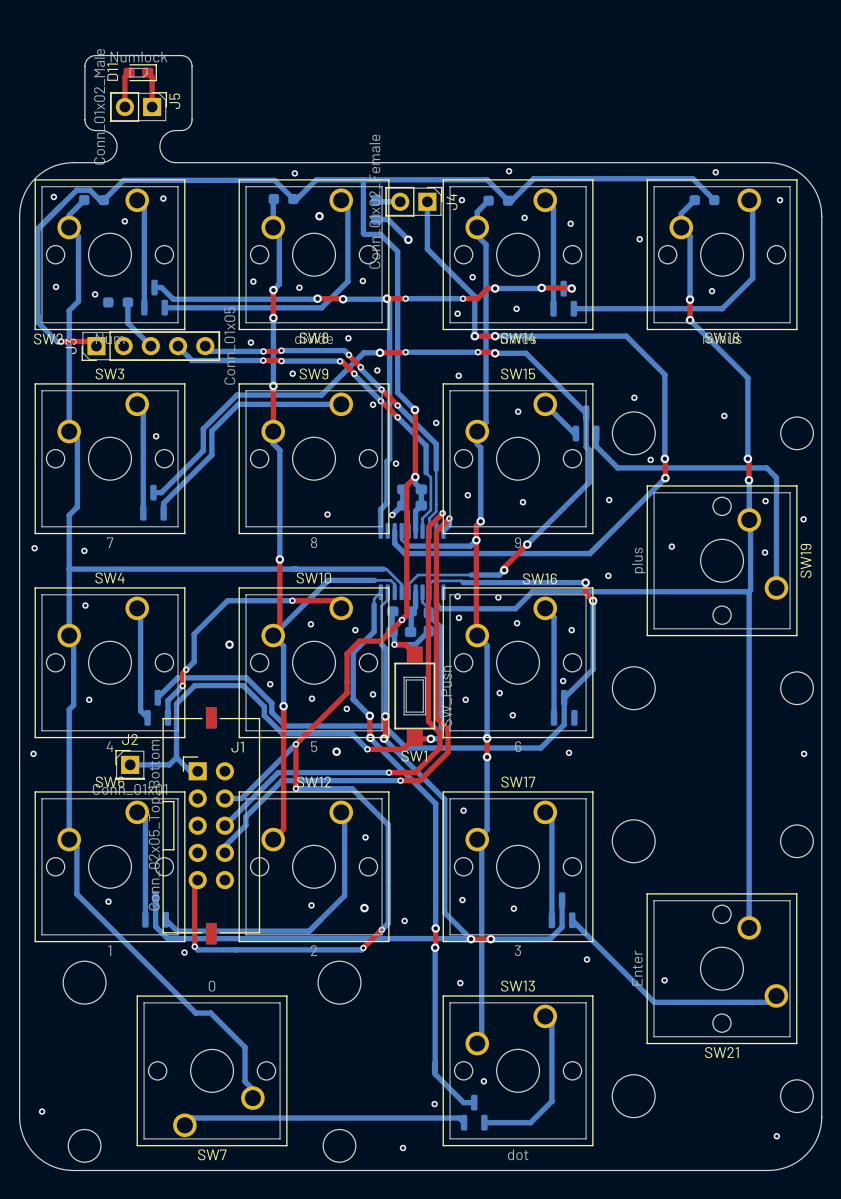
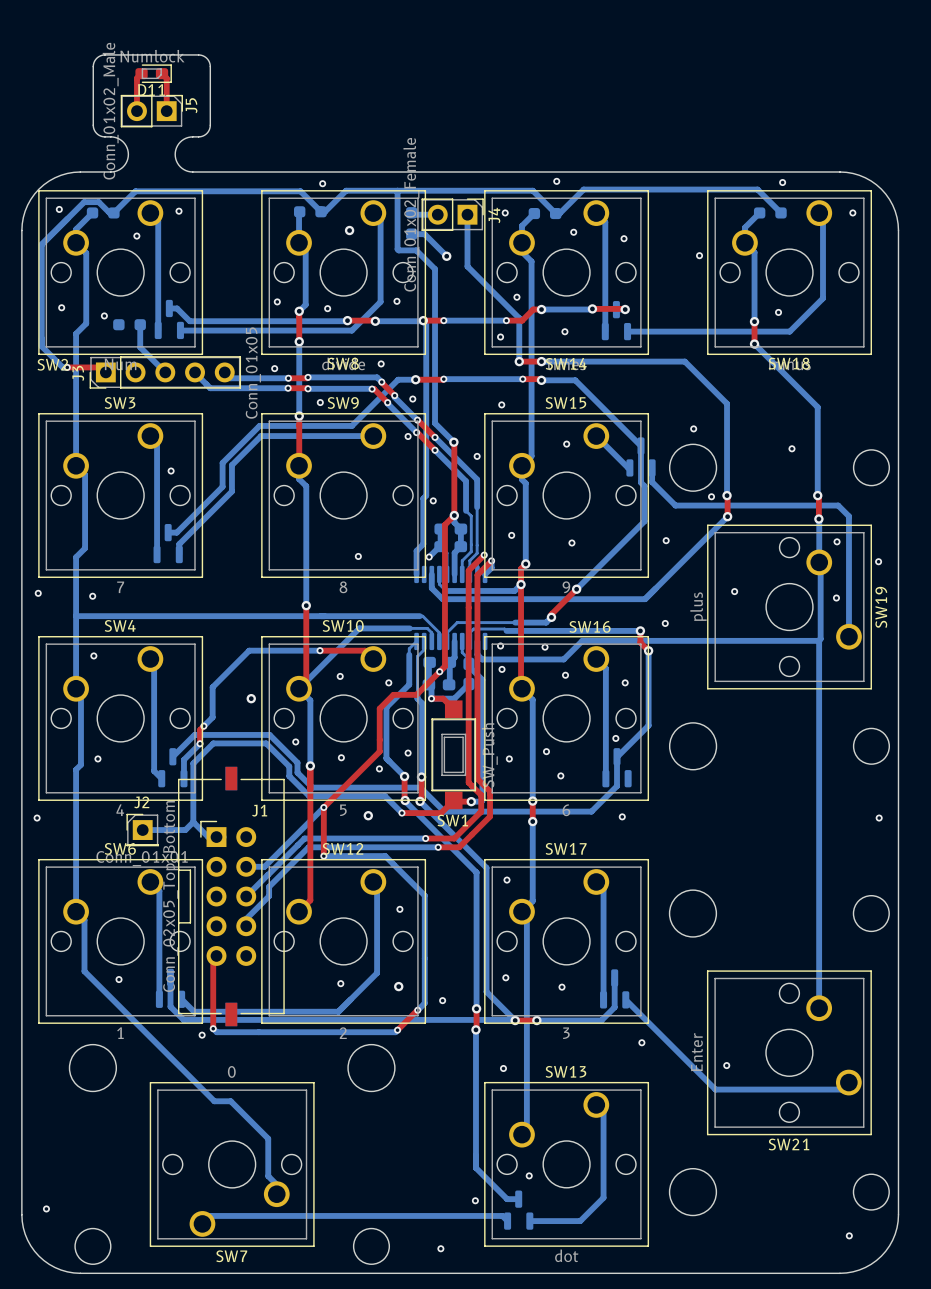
D11 name rotation: 0° (112, 72) -> 90° clockwise (151, 89)

